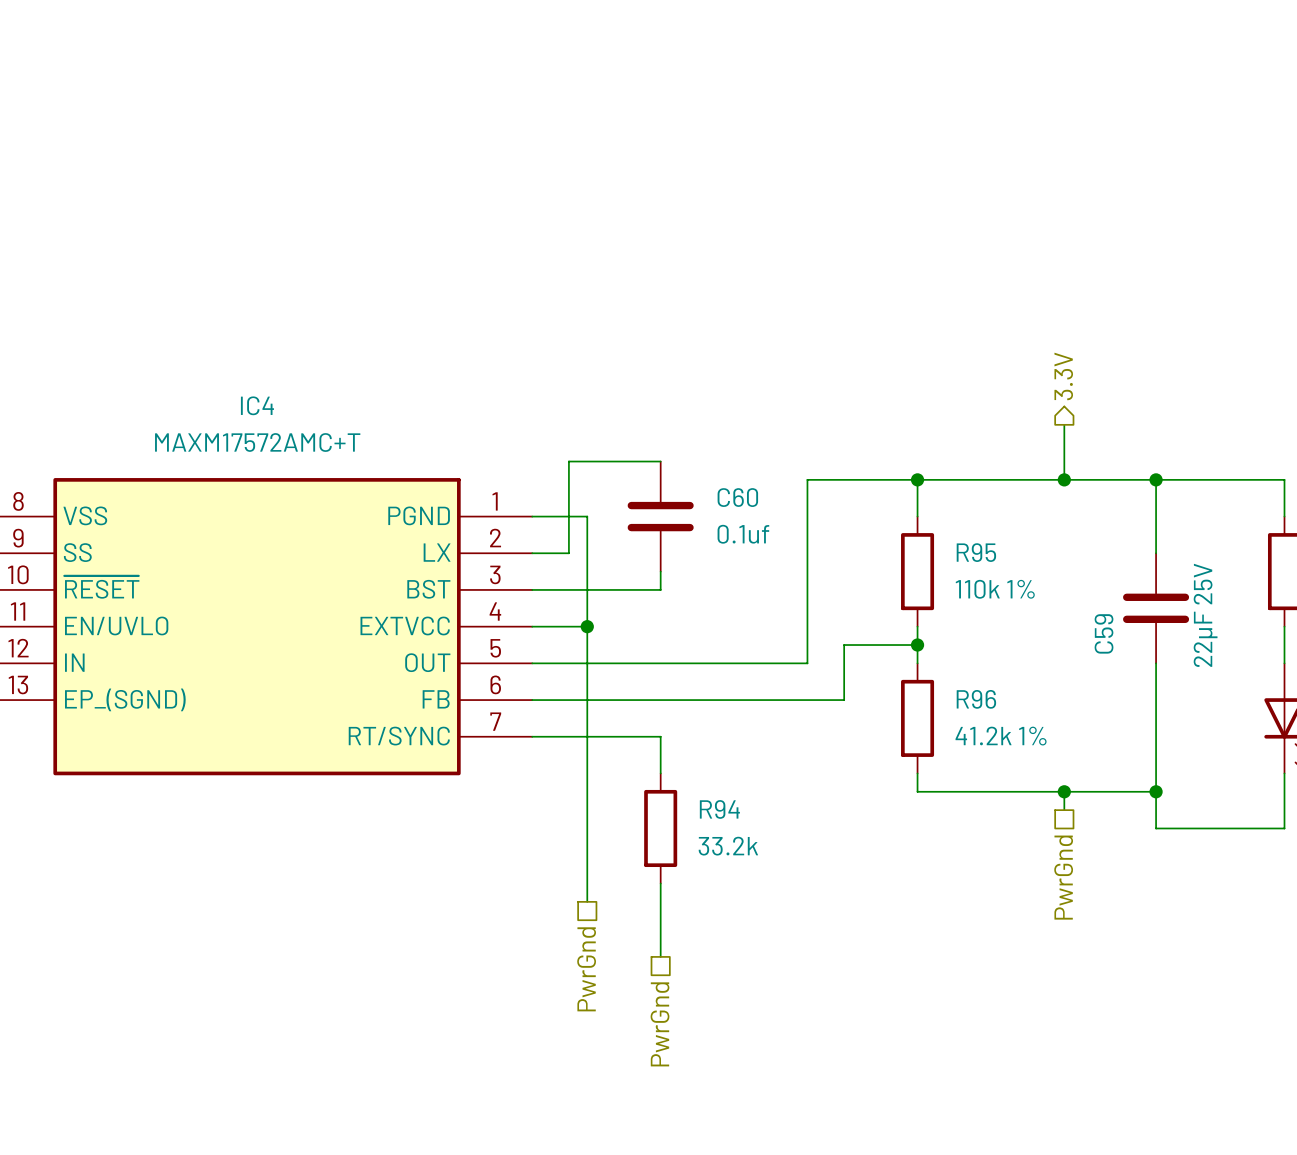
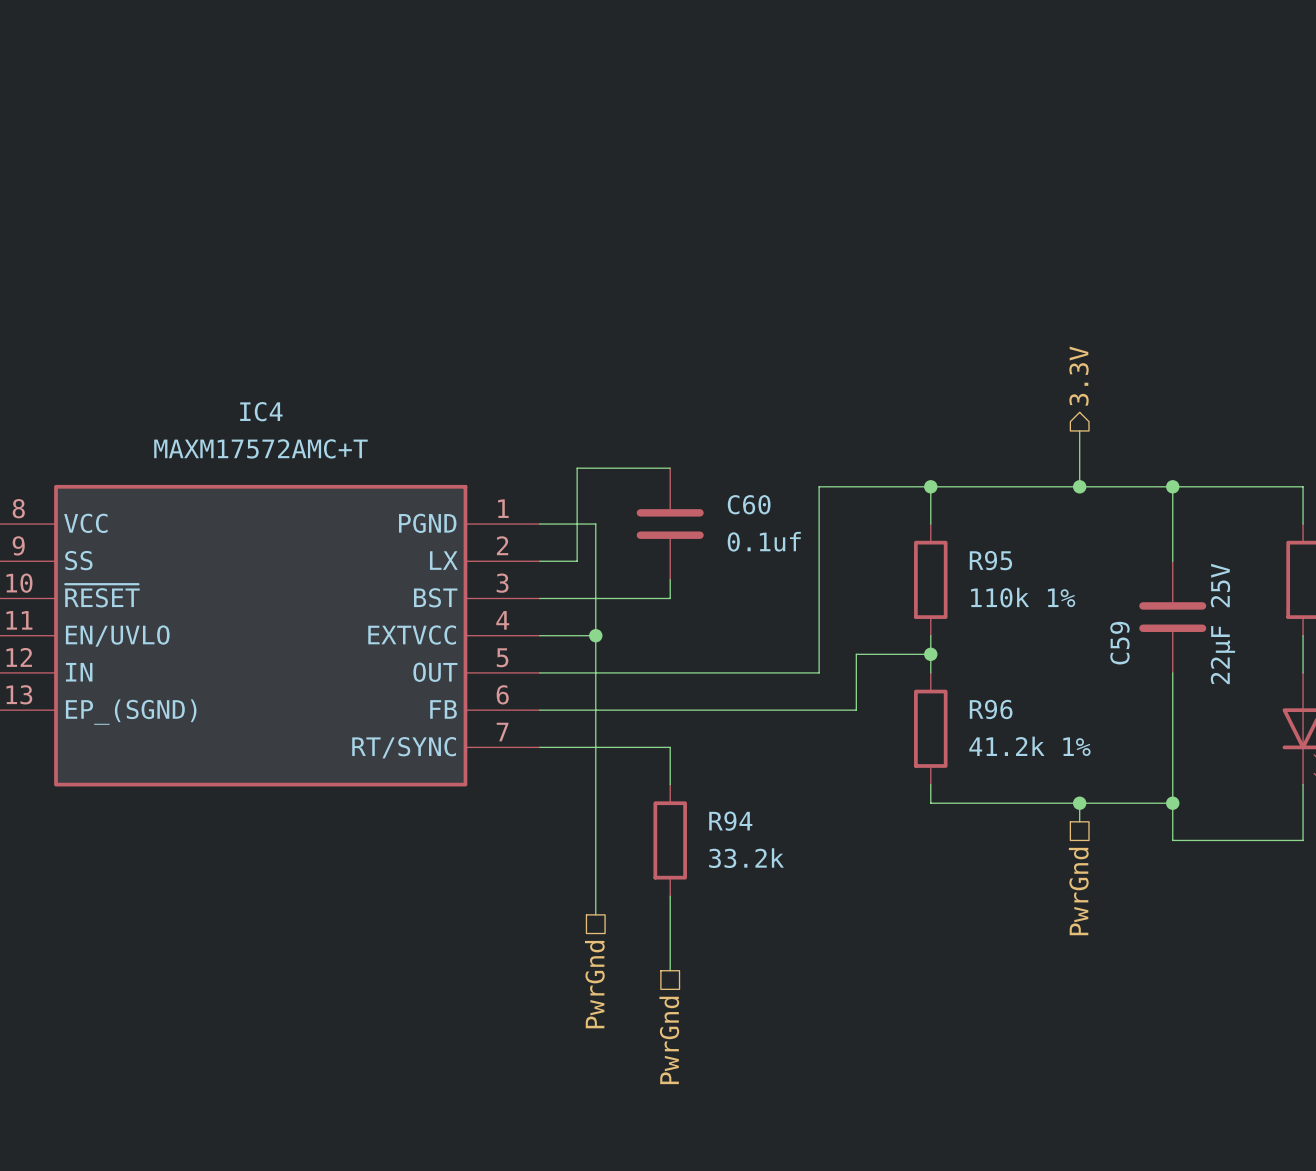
IC4 pin name: VSS (85, 515) -> VCC (85, 523)

